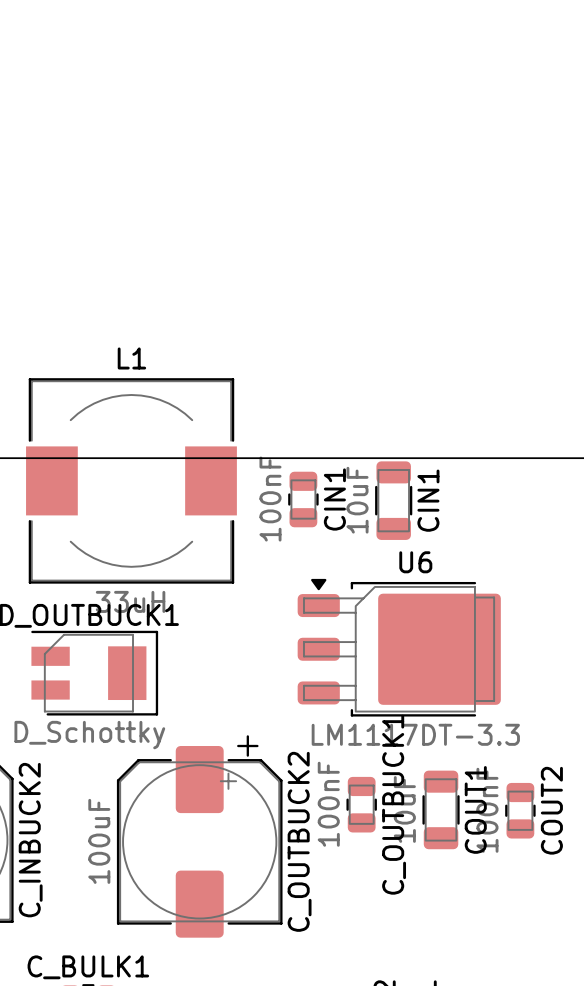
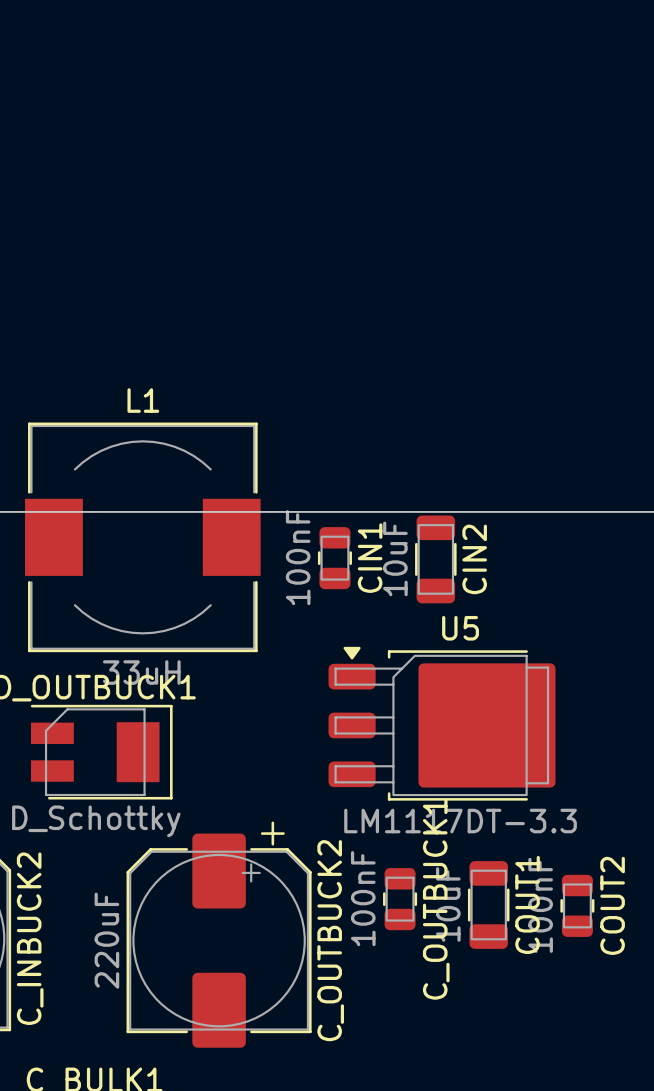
CIN1 name: CIN1 (428, 500) -> CIN2 (474, 559)
U6 name: U6 (415, 562) -> U5 (460, 628)
C_OUTBUCK2 value: 100uF (99, 841) -> 220uF (106, 940)

